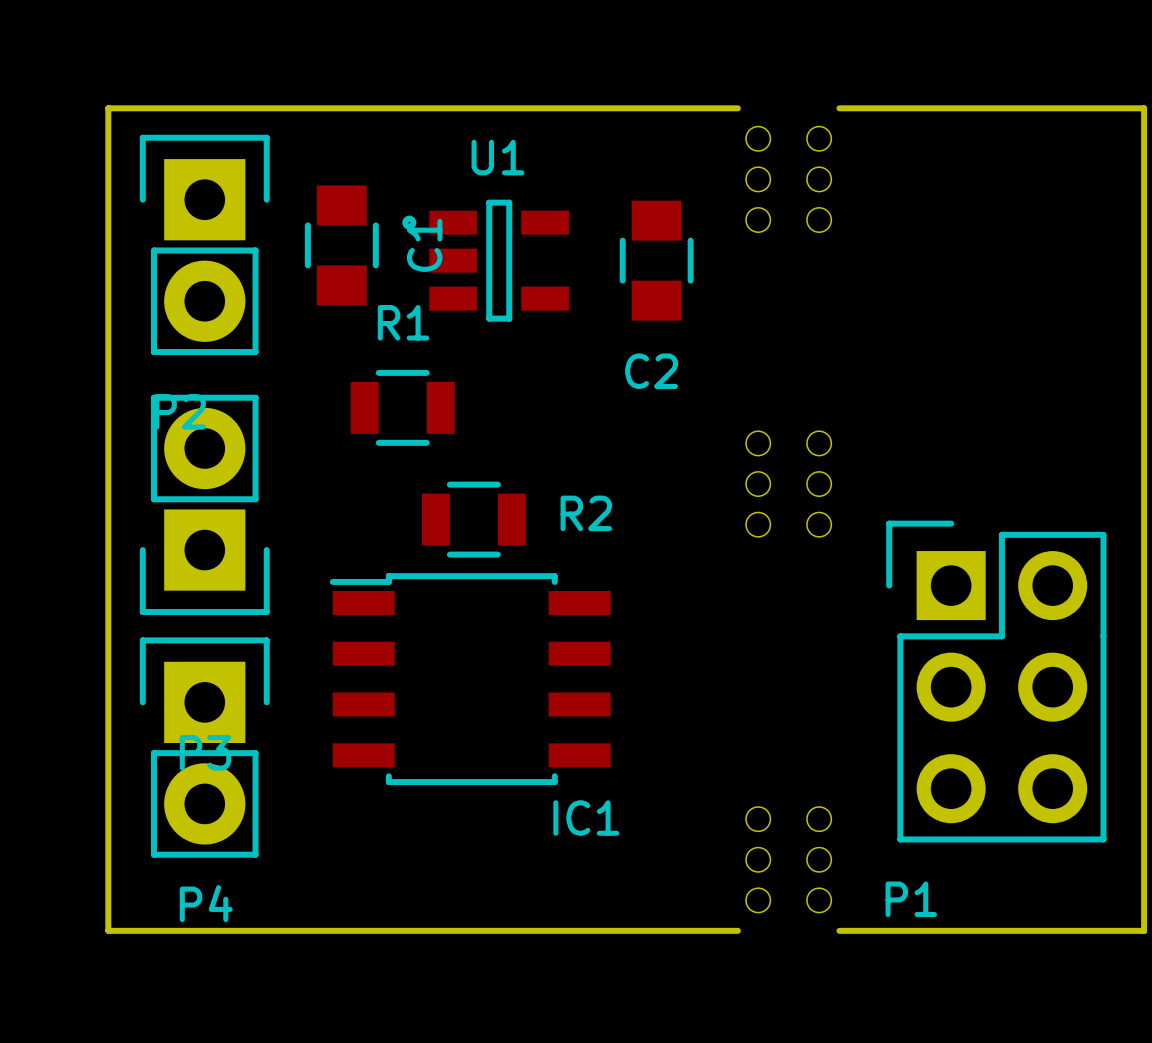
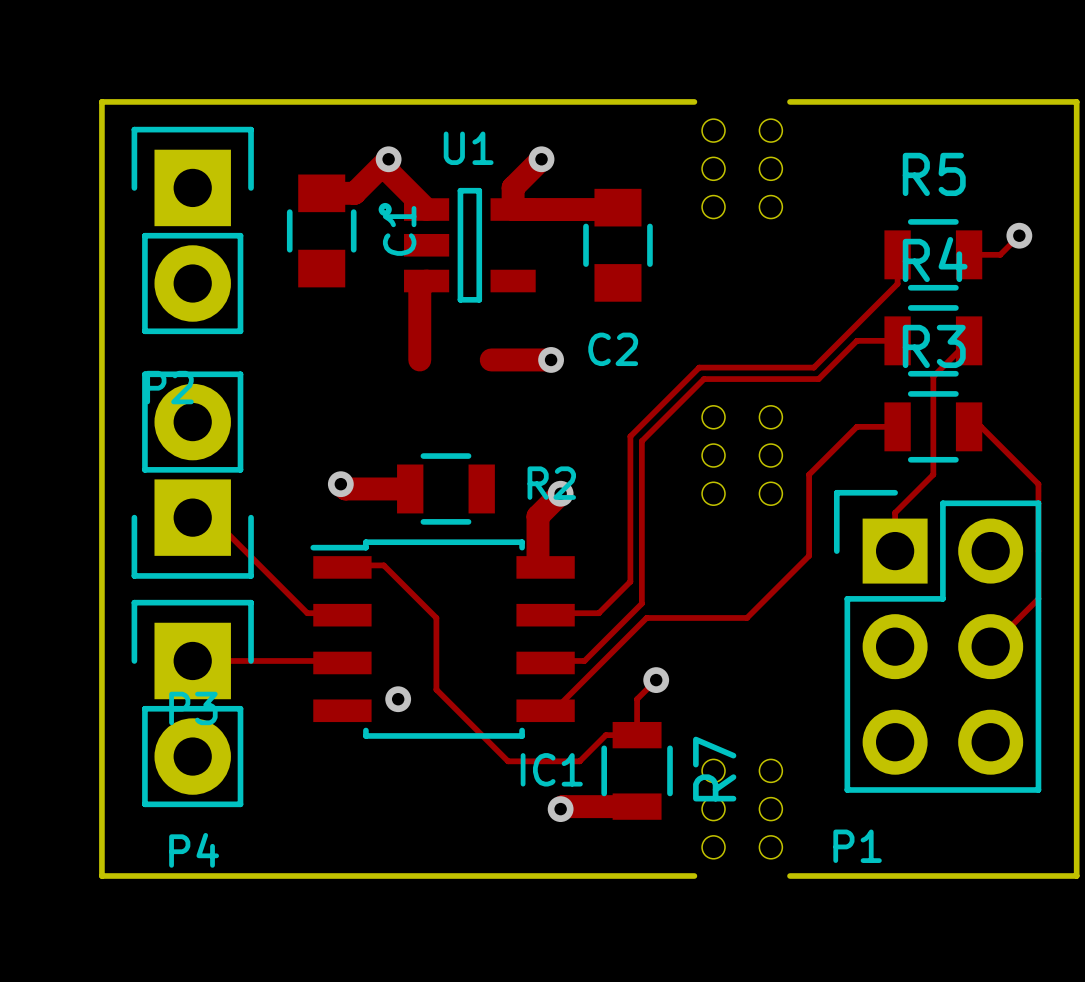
via: none -> (388, 159)
track: none -> (541, 159) (513, 187) (513, 209) (616, 209) (617, 207)
via: none -> (541, 159)
track: none -> (321, 193) (354, 193) (388, 159) (388, 171) (426, 209)
track: none -> (1019, 235) (1000, 254) (969, 254)
via: none -> (1019, 235)
track: none -> (897, 254) (897, 283) (813, 367) (699, 367) (630, 436) (630, 581) (598, 613) (537, 613)
R5: none -> (933, 254)
track: none -> (426, 281) (419, 287) (419, 359)
track: none -> (897, 340) (856, 340) (818, 379) (703, 379) (641, 441) (641, 603) (584, 660) (537, 660)
R4: none -> (933, 340)
track: none -> (969, 340) (933, 376) (933, 474) (895, 512) (895, 551)
track: none -> (491, 359) (551, 359)
via: none -> (551, 359)
R1: (402, 407) -> none
track: none -> (897, 426) (856, 426) (809, 474) (809, 555) (746, 617) (646, 617) (555, 708) (537, 708)
R3: none -> (933, 426)
track: none -> (969, 426) (981, 426) (1038, 484) (1038, 598) (990, 646)
track: none -> (340, 484) (345, 488) (410, 488)
via: none -> (340, 484)
track: none -> (560, 493) (537, 516) (537, 565)
via: none -> (560, 493)
track: none -> (192, 517) (211, 517) (307, 613) (334, 613)
track: none -> (334, 565) (383, 565) (436, 617) (436, 689) (508, 761) (579, 761) (605, 735) (637, 735) (637, 699) (656, 680)
track: none -> (192, 660) (334, 660)
via: none -> (656, 680)
via: none -> (398, 699)
R7: none -> (637, 770)
track: none -> (637, 806) (563, 806) (560, 809)
via: none -> (560, 809)

